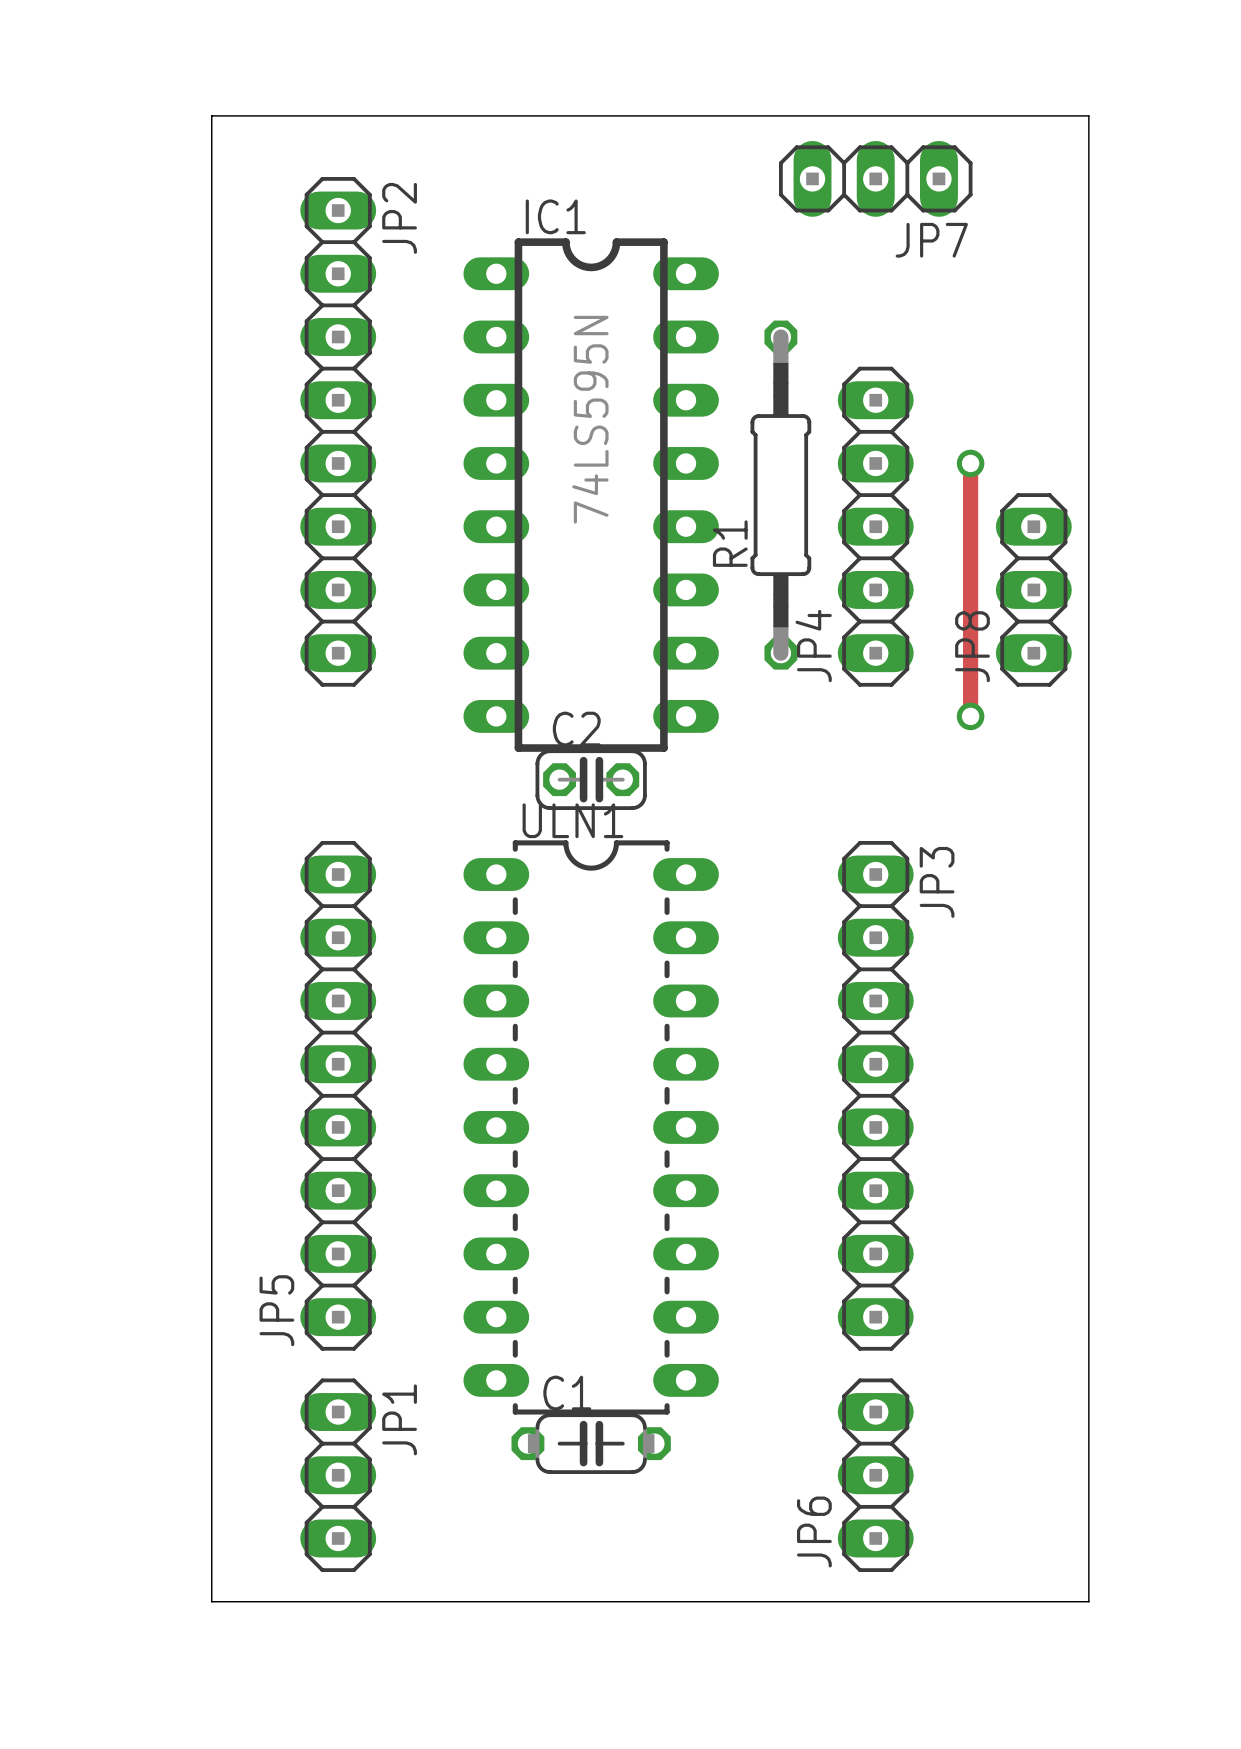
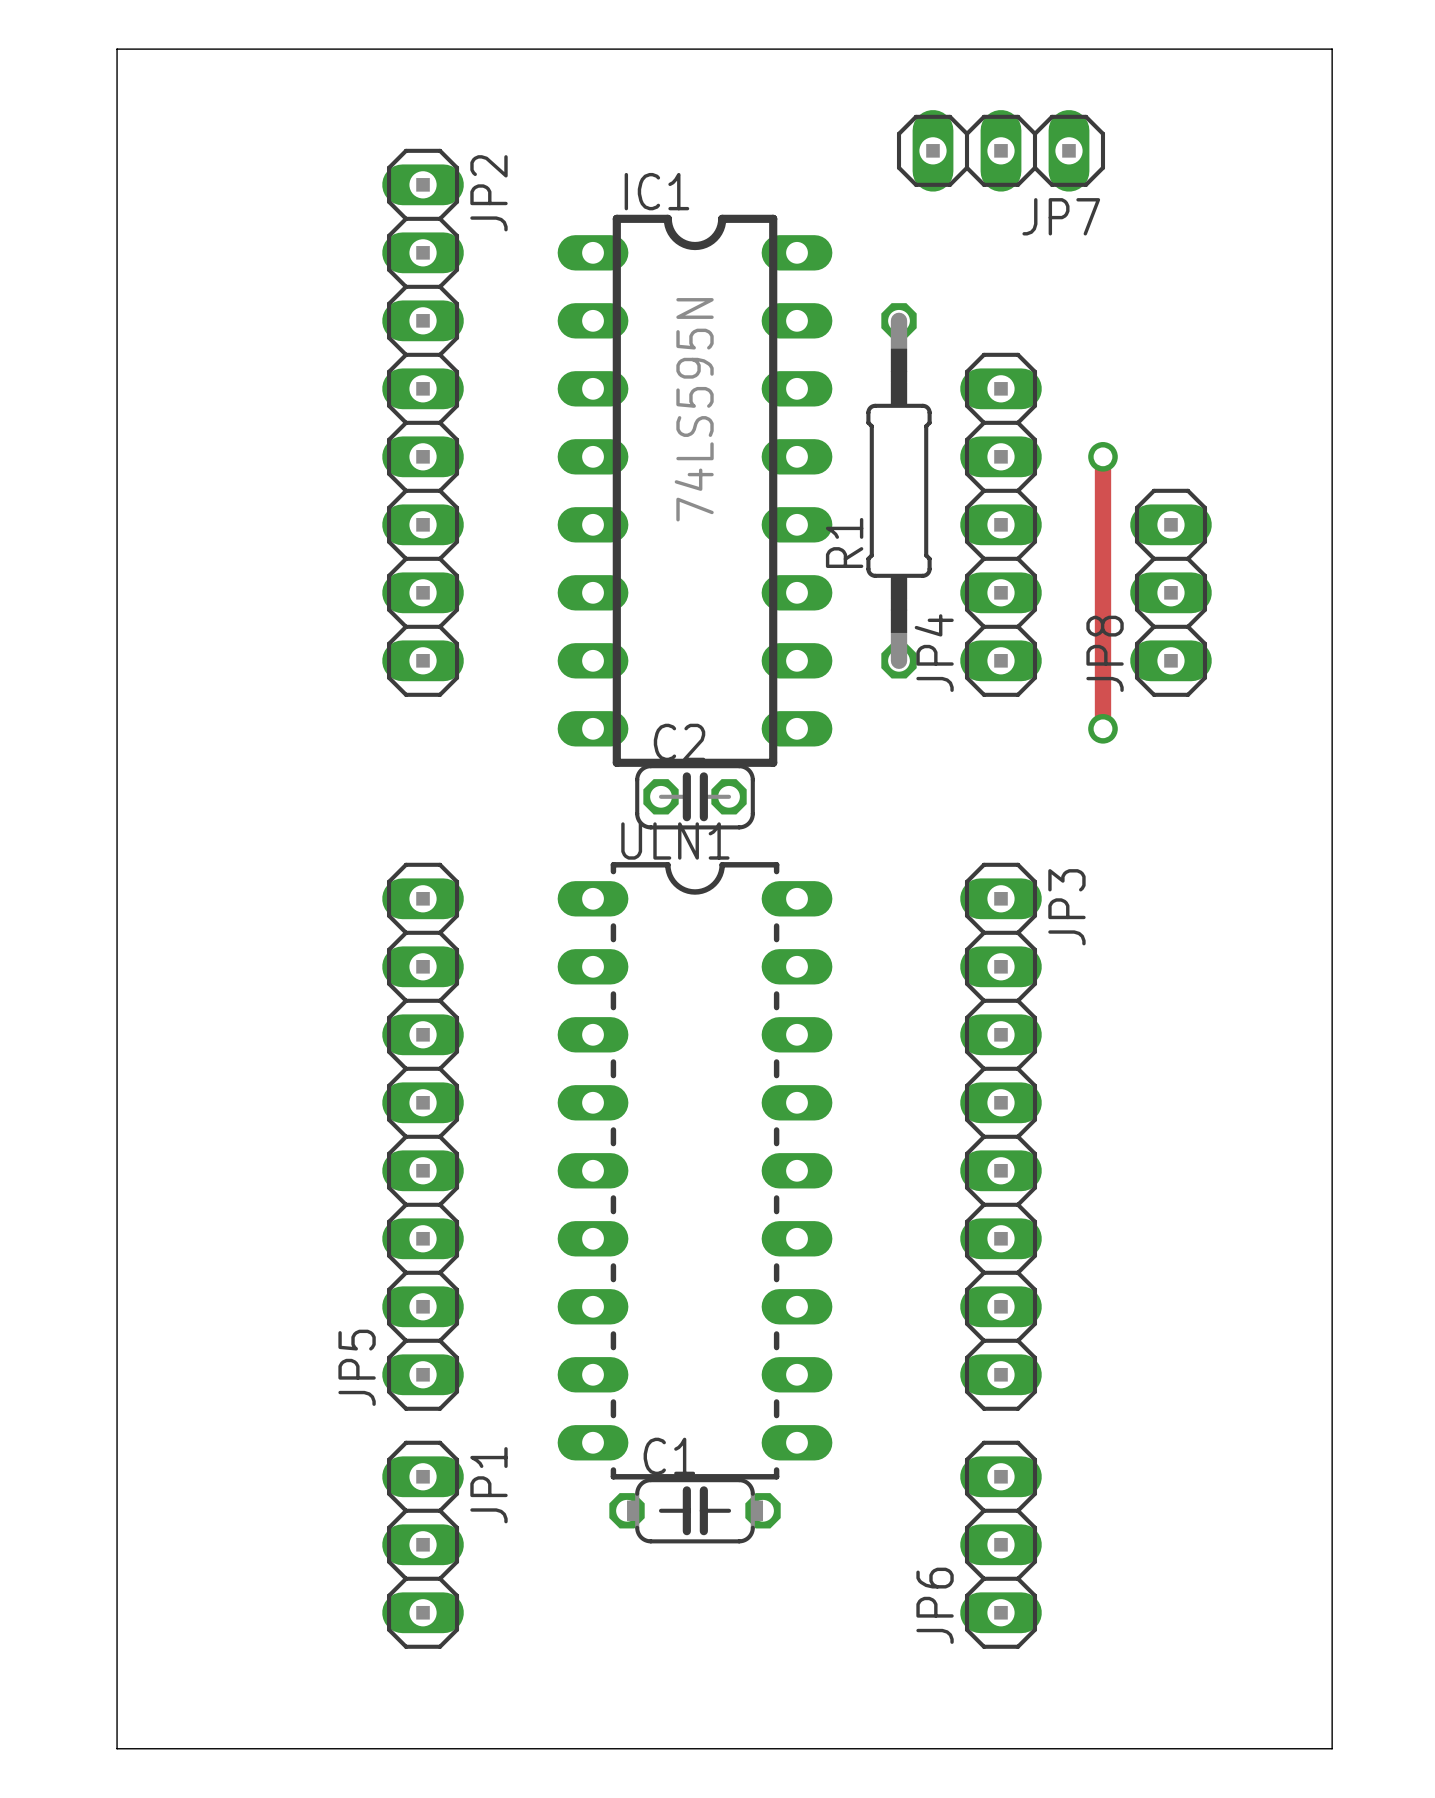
board edge: (211, 115) (1088, 115) (1088, 1601) (211, 1601) (211, 115) -> (117, 49) (117, 1748) (1332, 1748) (1332, 49) (117, 49)

